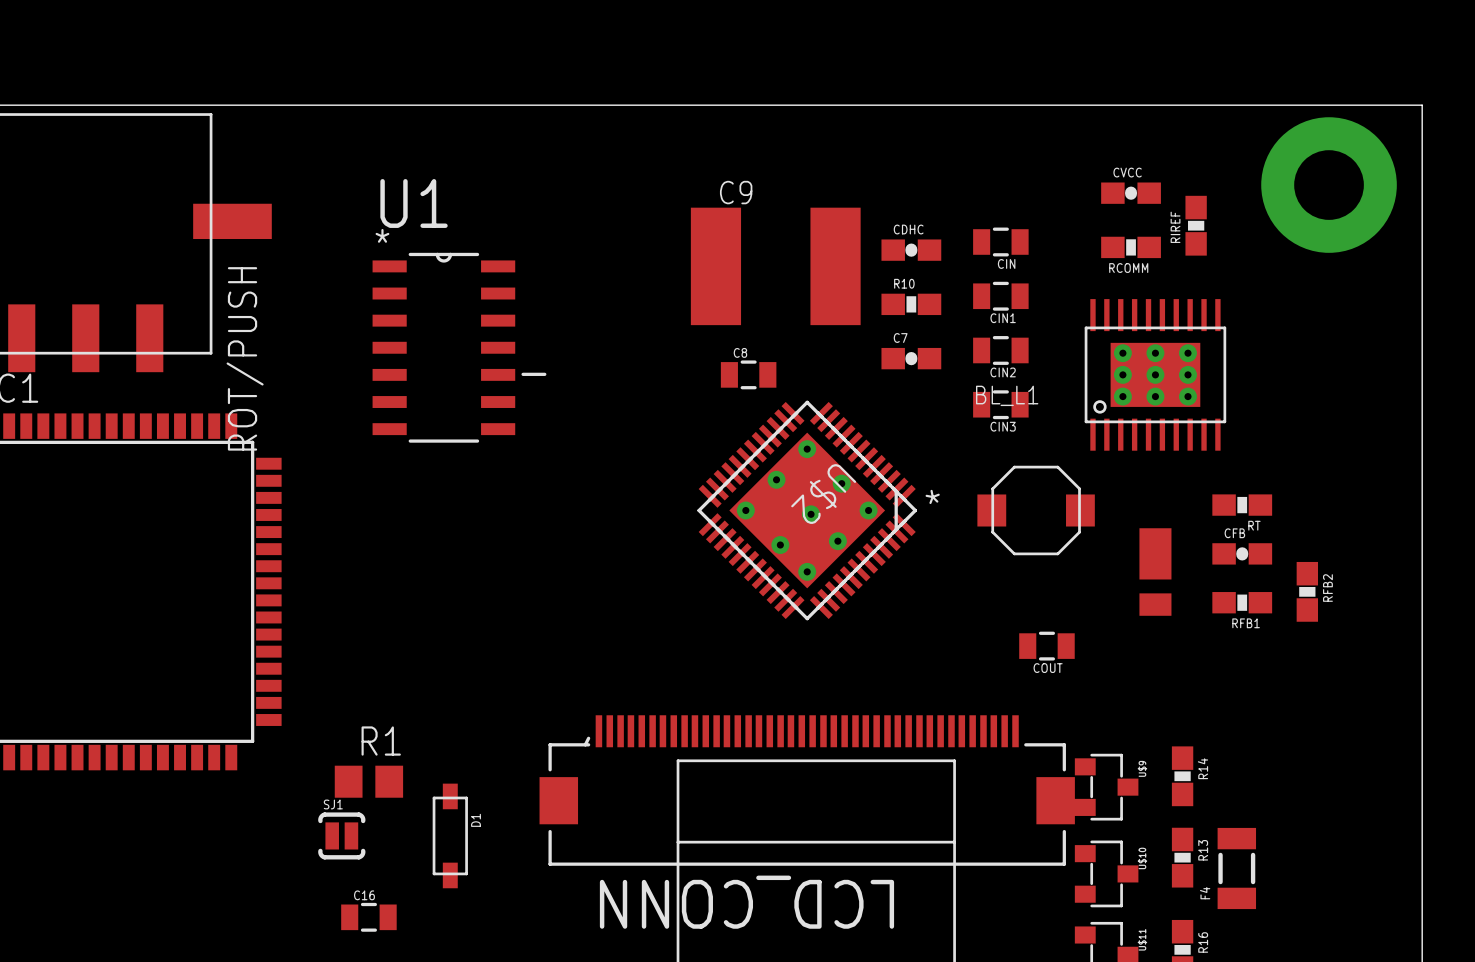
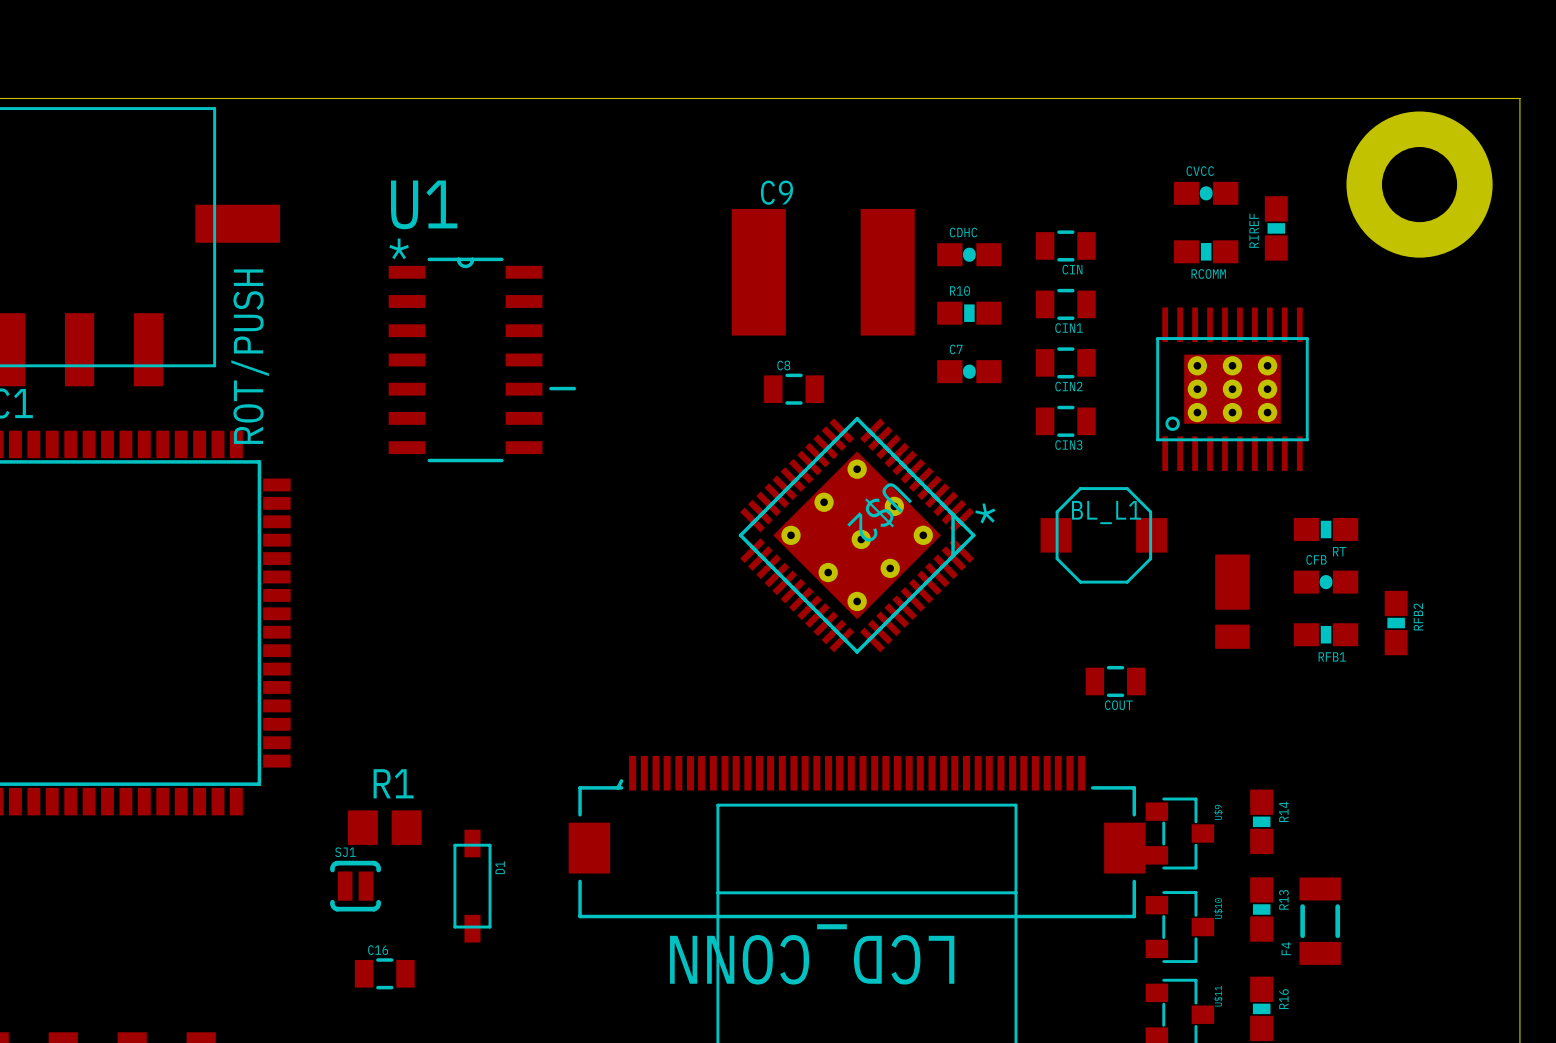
BL_L1 name position: BL_L1 (1007, 395) -> BL_L1 (1106, 512)

